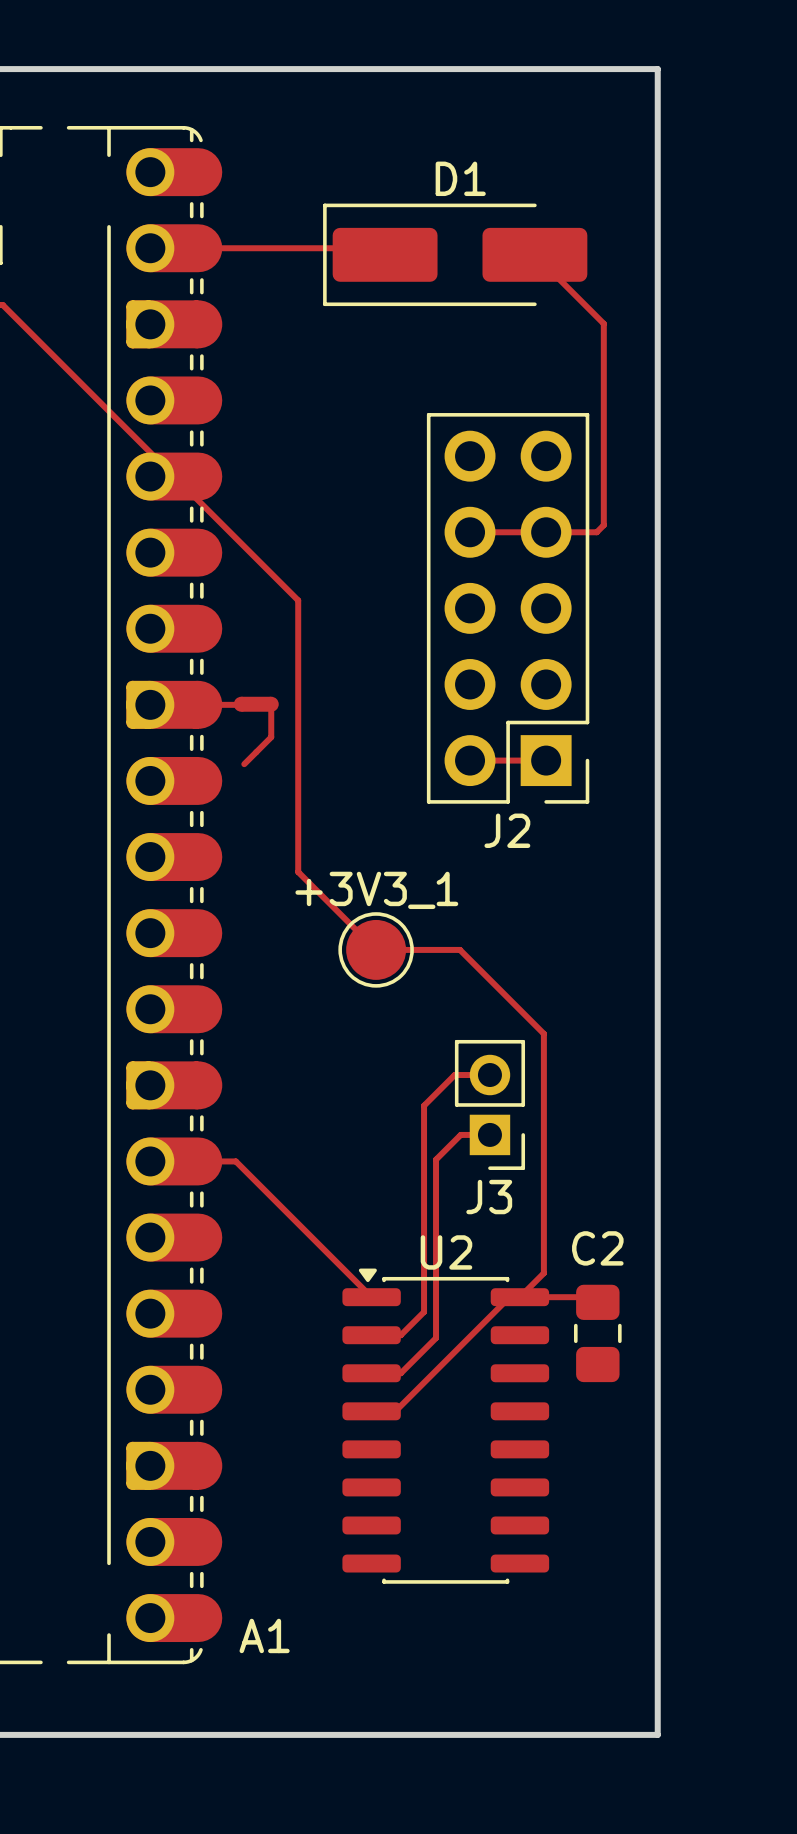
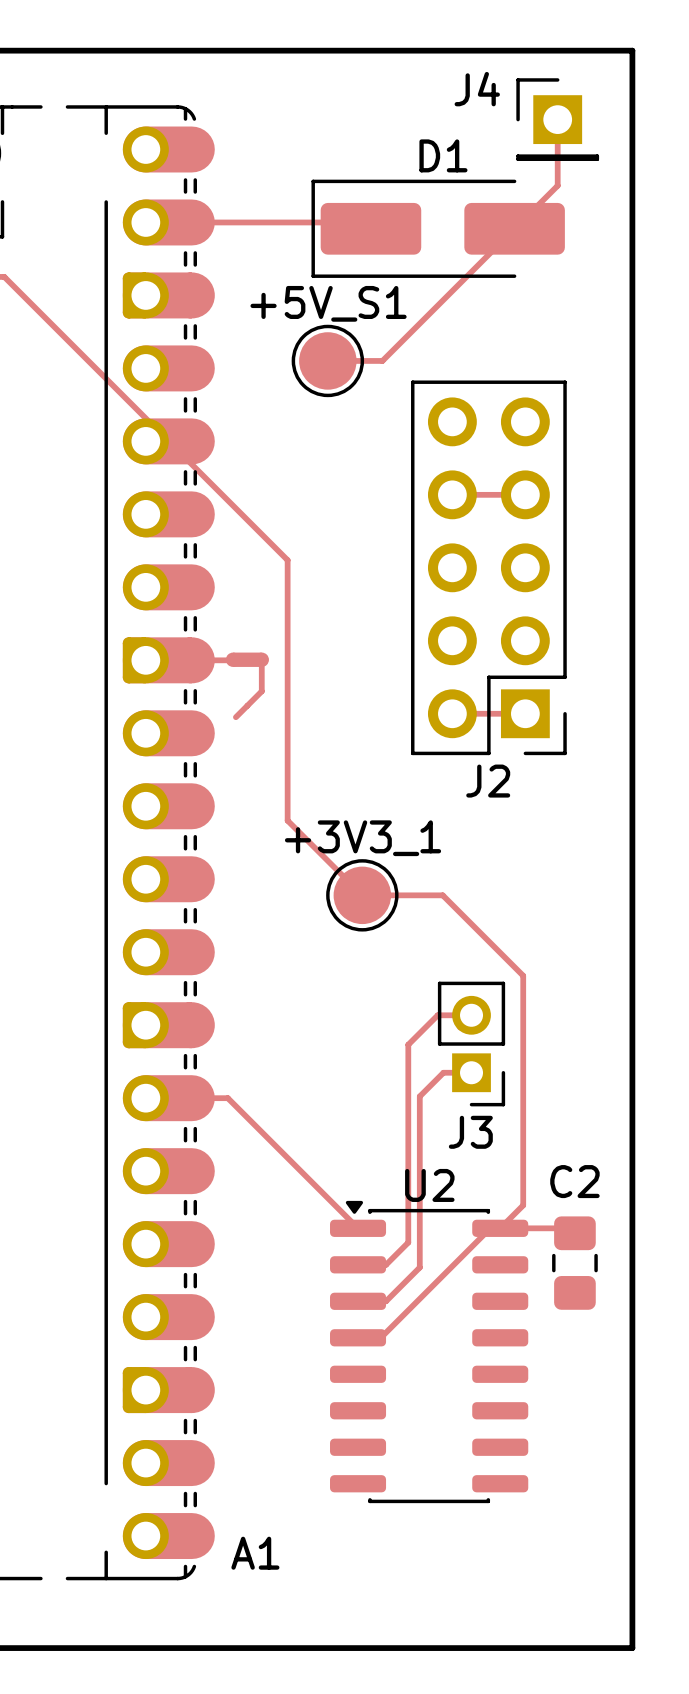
track: none -> (557, 119) (557, 185) (382, 360) (327, 360)
J4: none -> (557, 119)
track: (534, 254) (603, 323) (603, 525) (596, 532) (546, 532) -> none
+5V_S1: none -> (327, 360)

